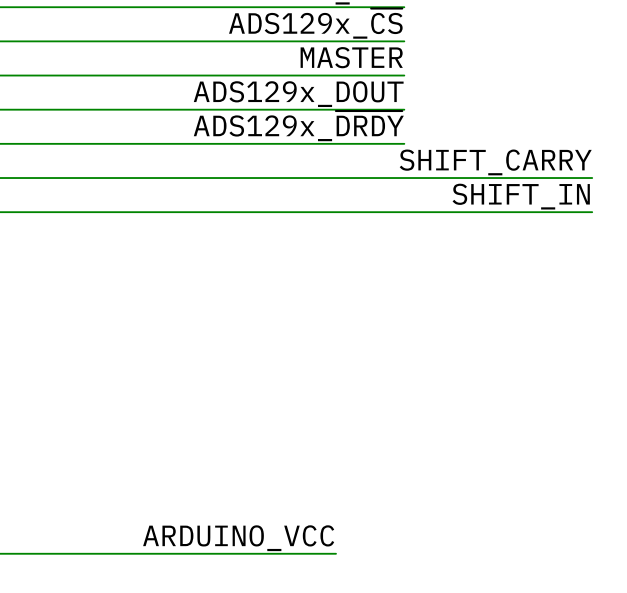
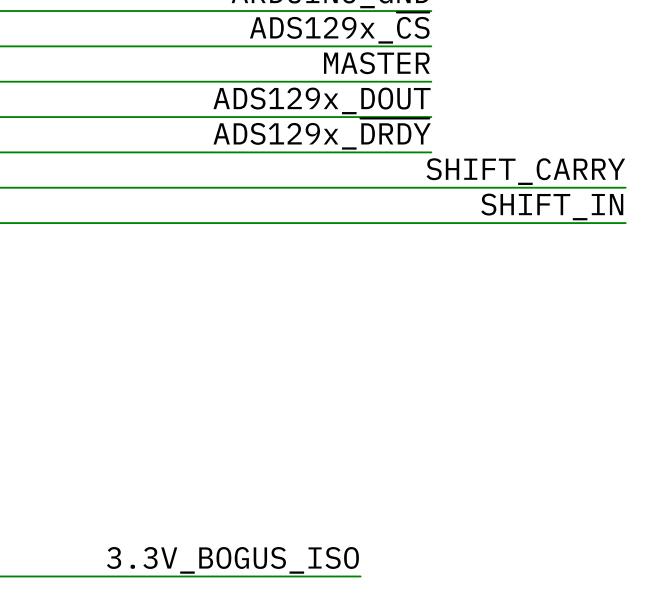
label: ARDUINO_VCC (238, 538) -> 3.3V_BOGUS_ISO (232, 560)

